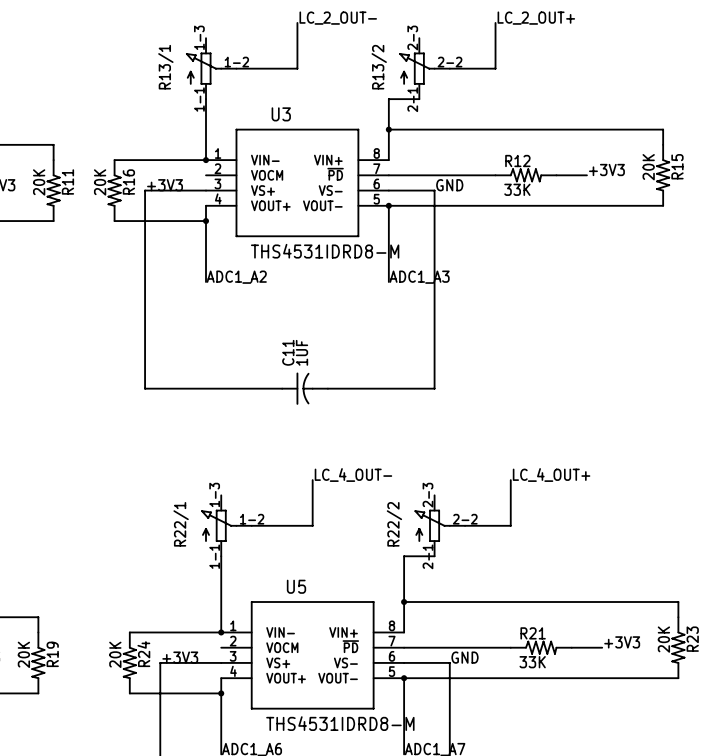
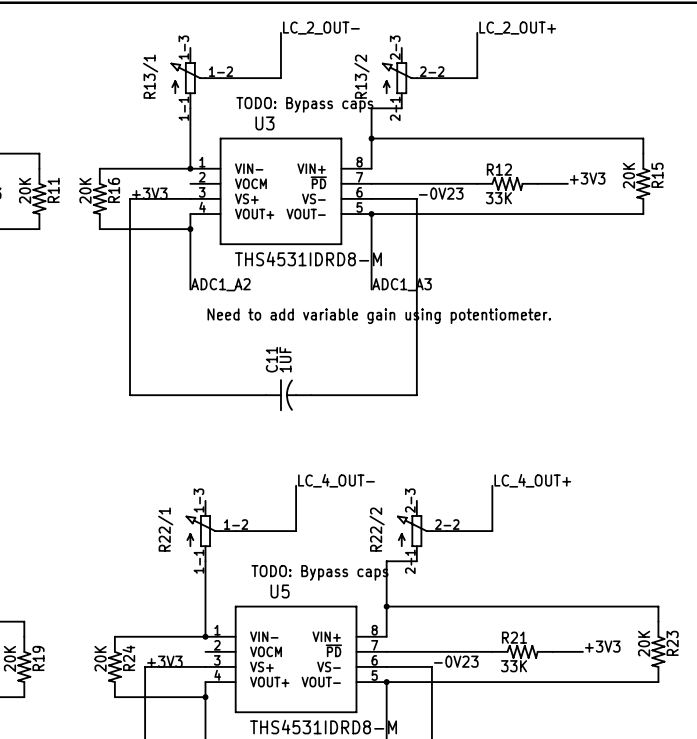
text: none -> TODO: Bypass caps (304, 104)
label: GND (449, 185) -> -0V23 (441, 193)
text: none -> Need to add variable gain using potentiometer. (379, 316)
text: none -> TODO: Bypass caps (319, 572)
label: GND (465, 657) -> -0V23 (456, 661)

